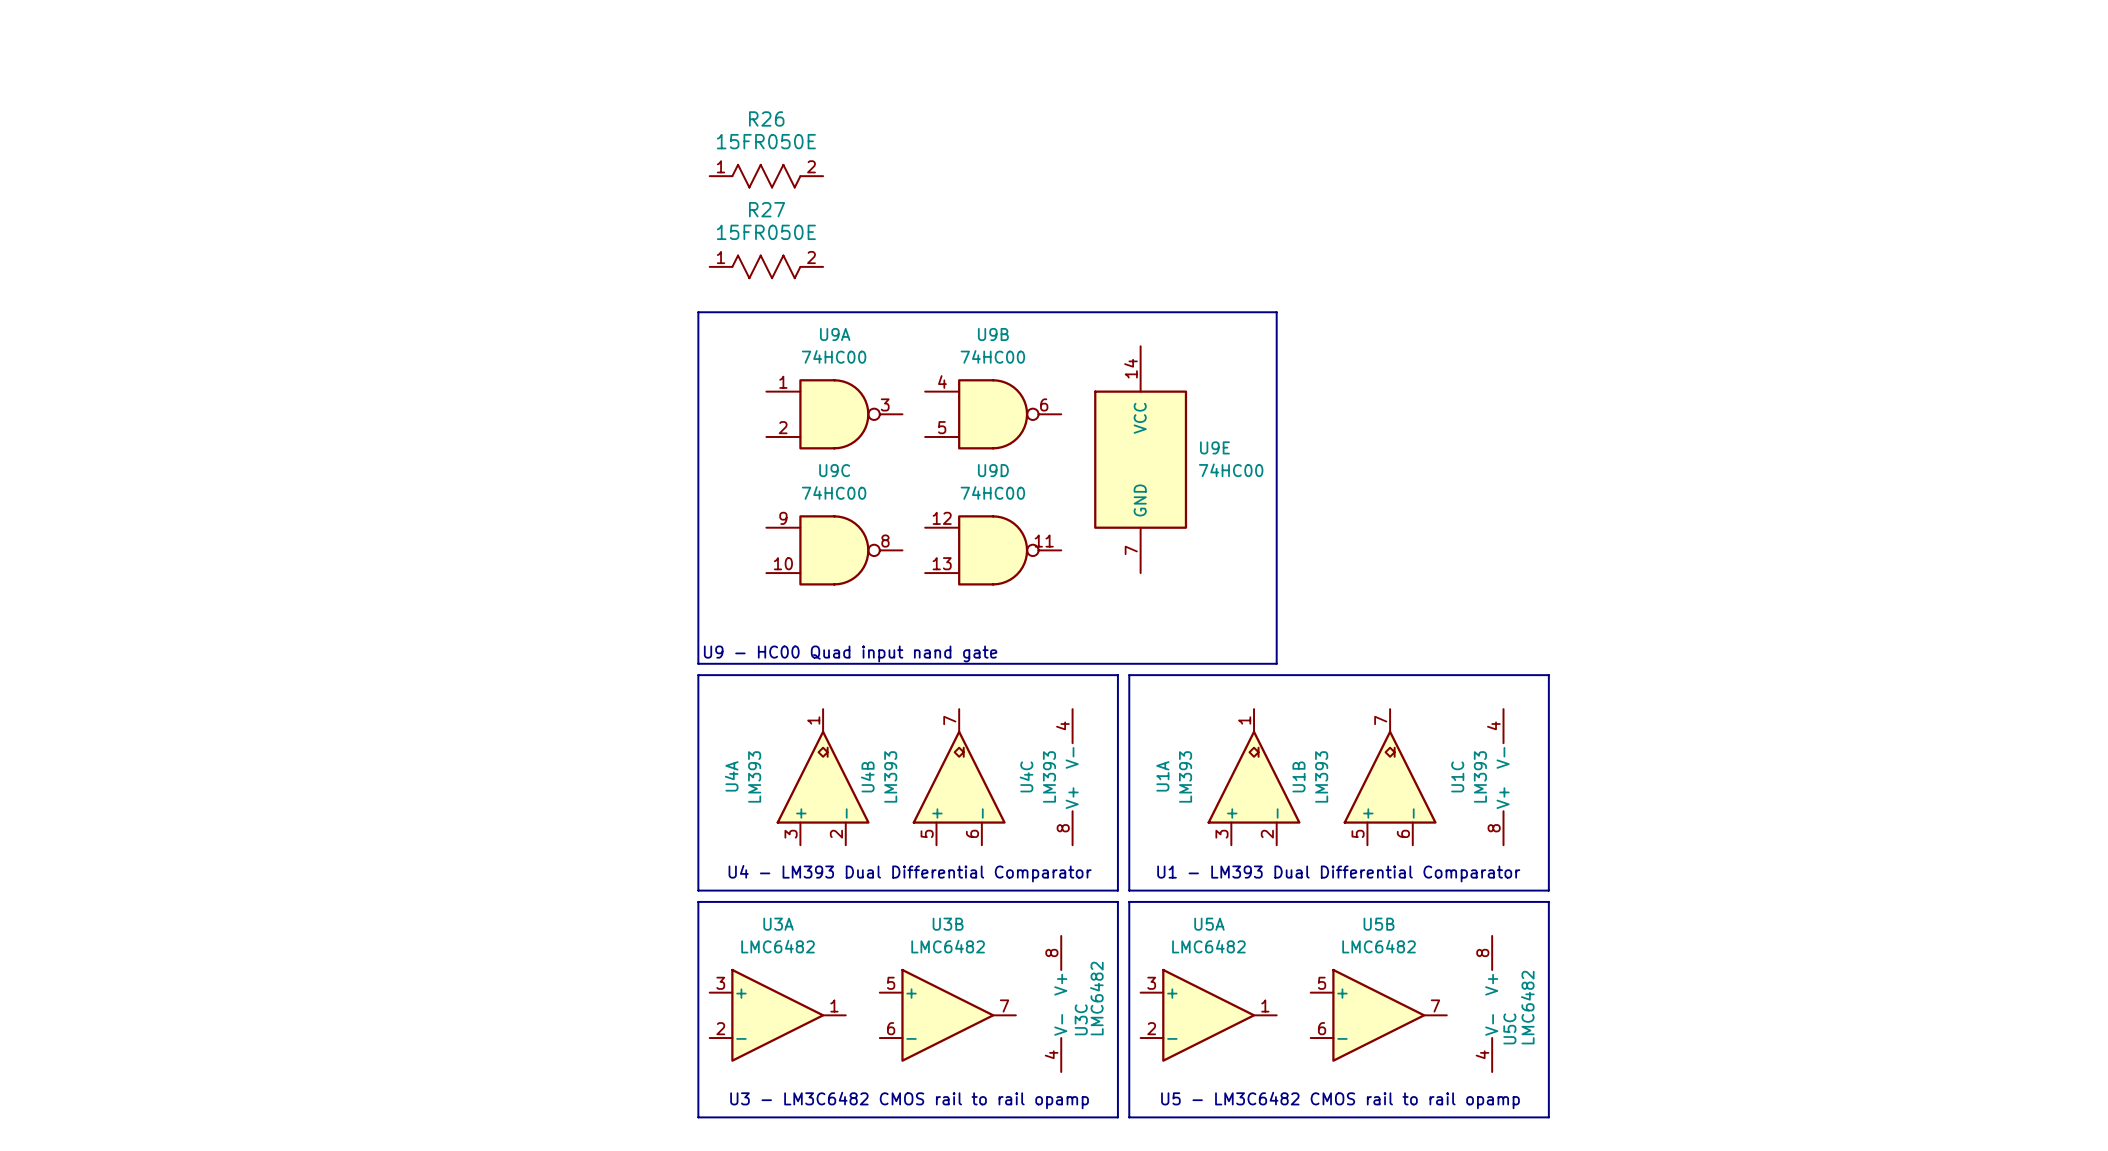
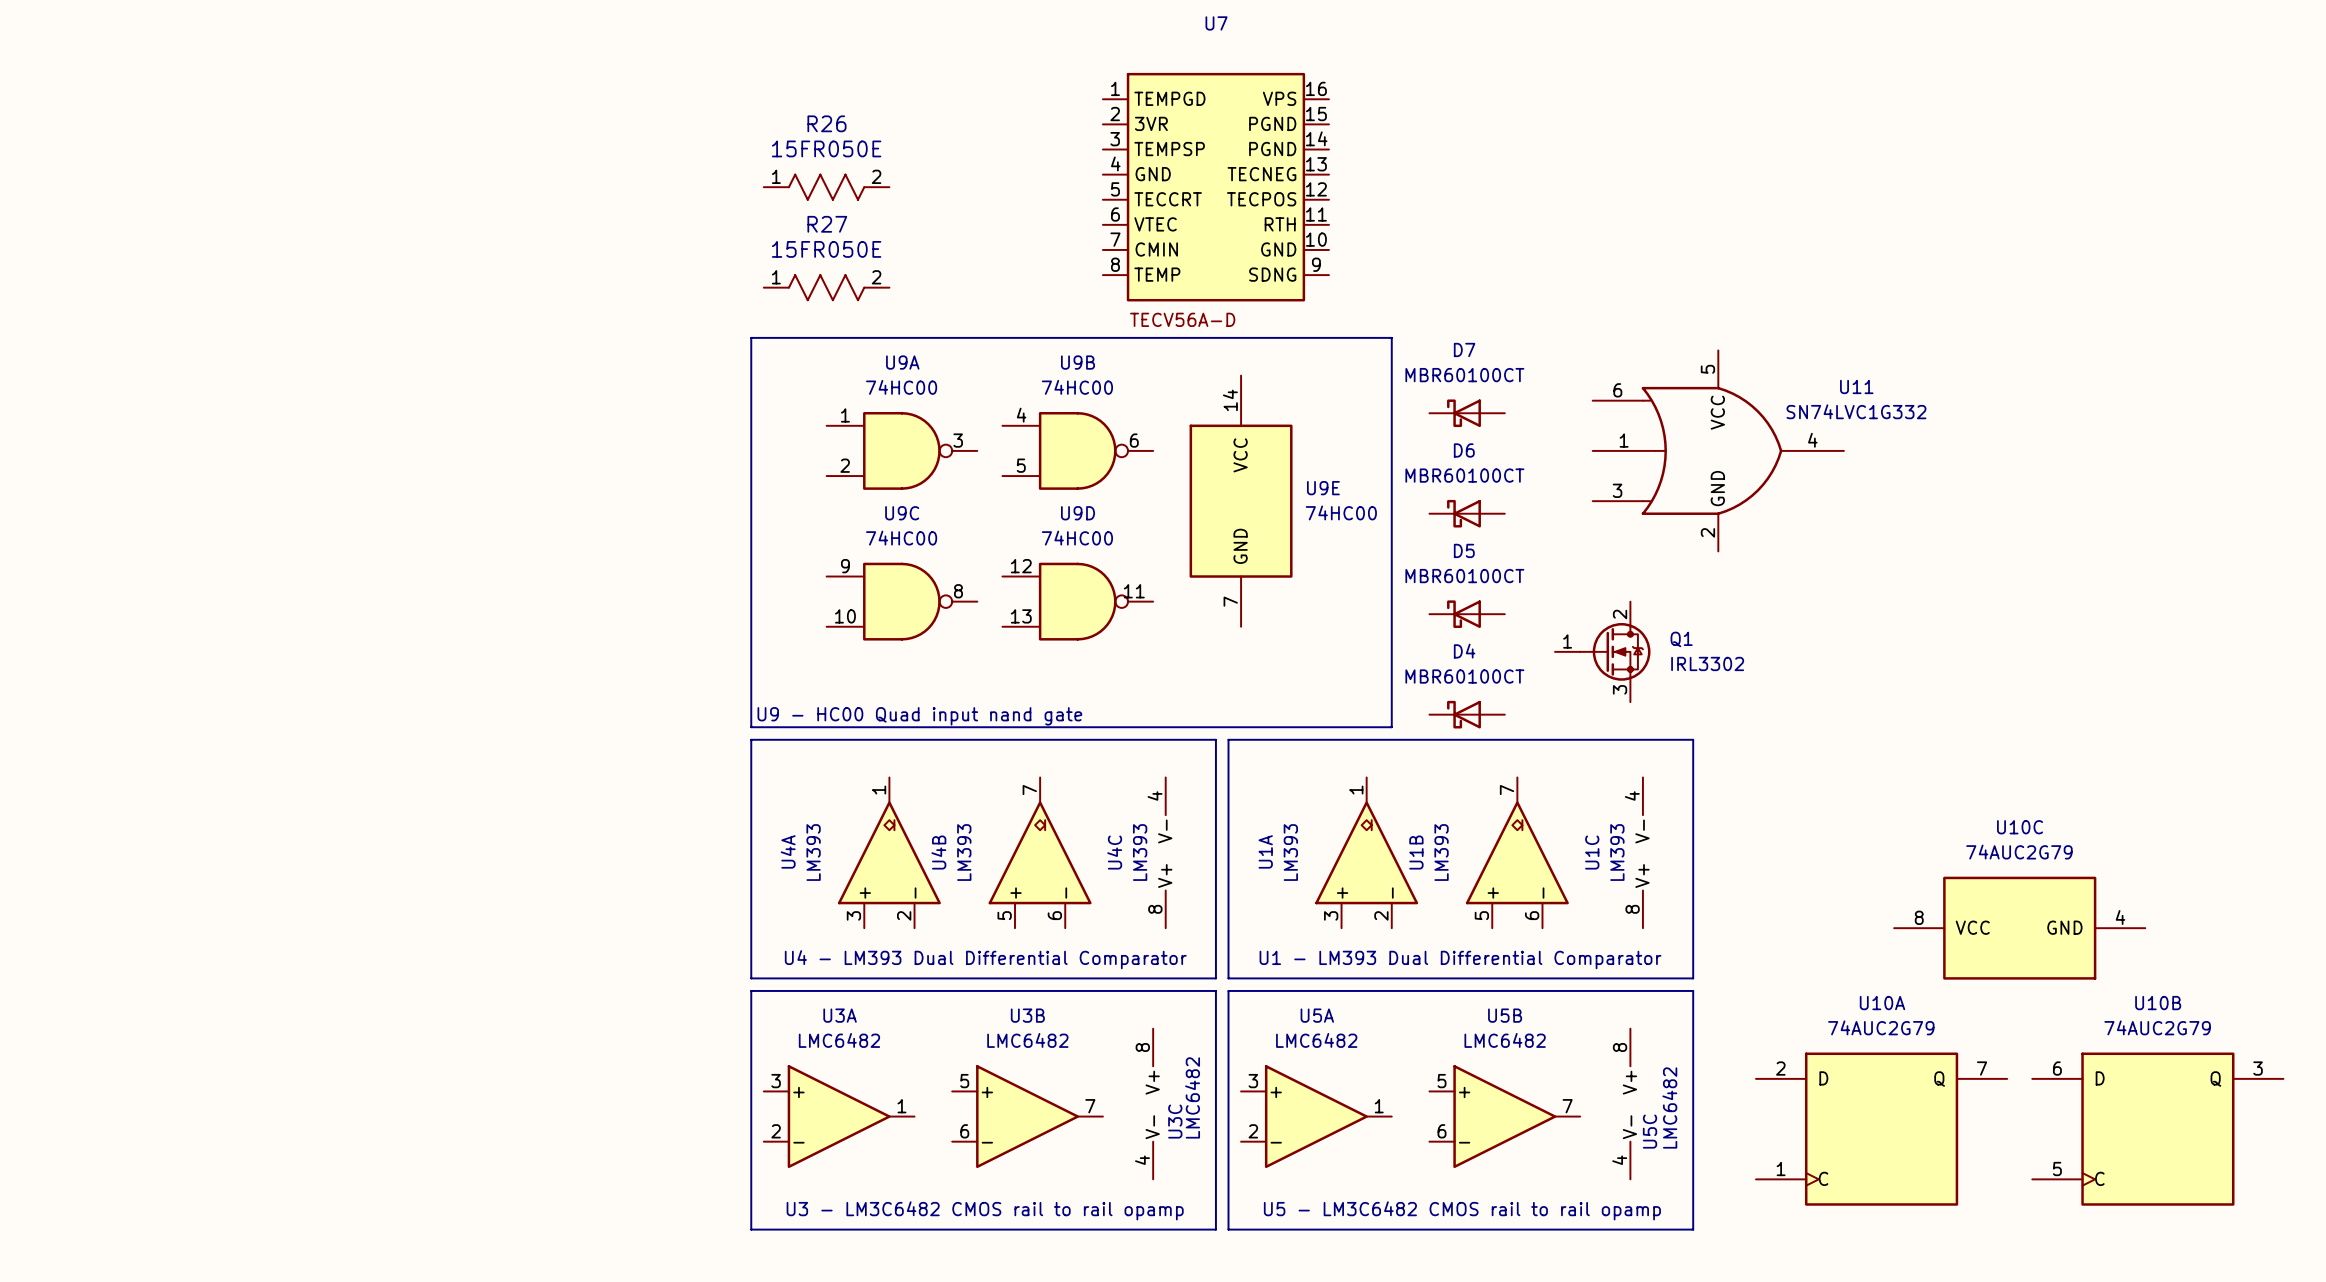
U7: none -> (1215, 187)
D7: none -> MBR60100CT (1467, 413)
U11: none -> SN74LVC1G332 (1718, 450)
D6: none -> MBR60100CT (1467, 513)
D5: none -> MBR60100CT (1467, 614)
Q1: none -> IRL3302 (1602, 651)
D4: none -> MBR60100CT (1467, 714)
U10C: none -> 74AUC2G79 (2019, 928)
U10A: none -> 74AUC2G79 (1881, 1129)
U10B: none -> 74AUC2G79 (2157, 1129)

